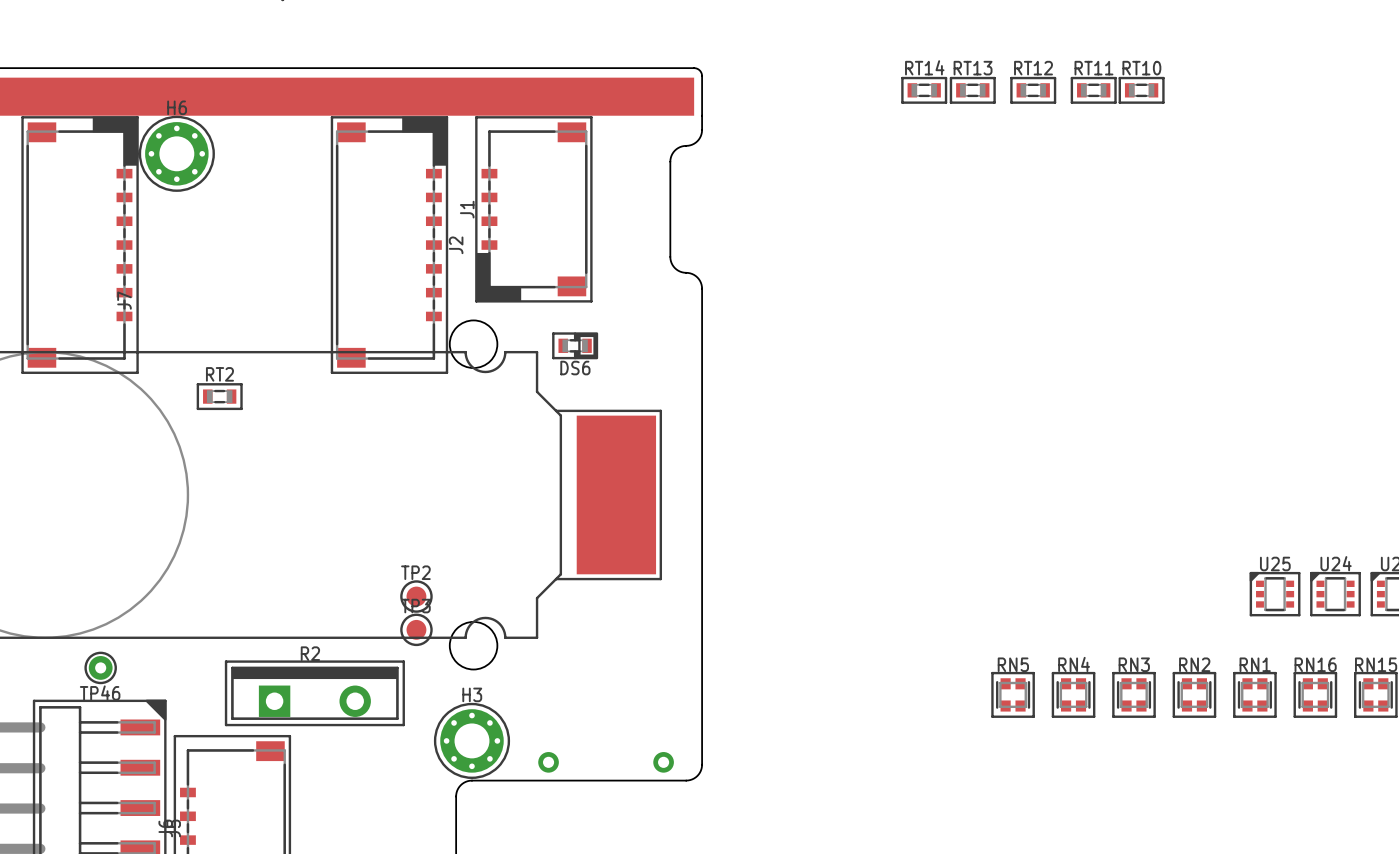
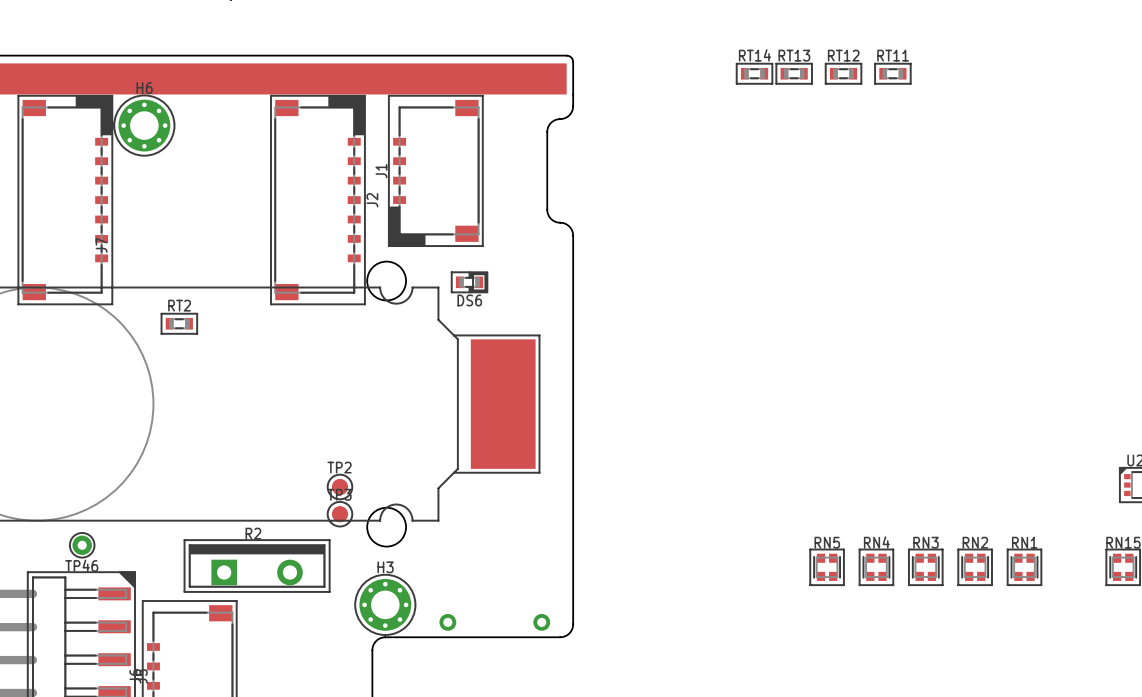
RT10: (1141, 90) -> none
U25: (1275, 594) -> none
U24: (1335, 594) -> none
RN16: (1315, 694) -> none

